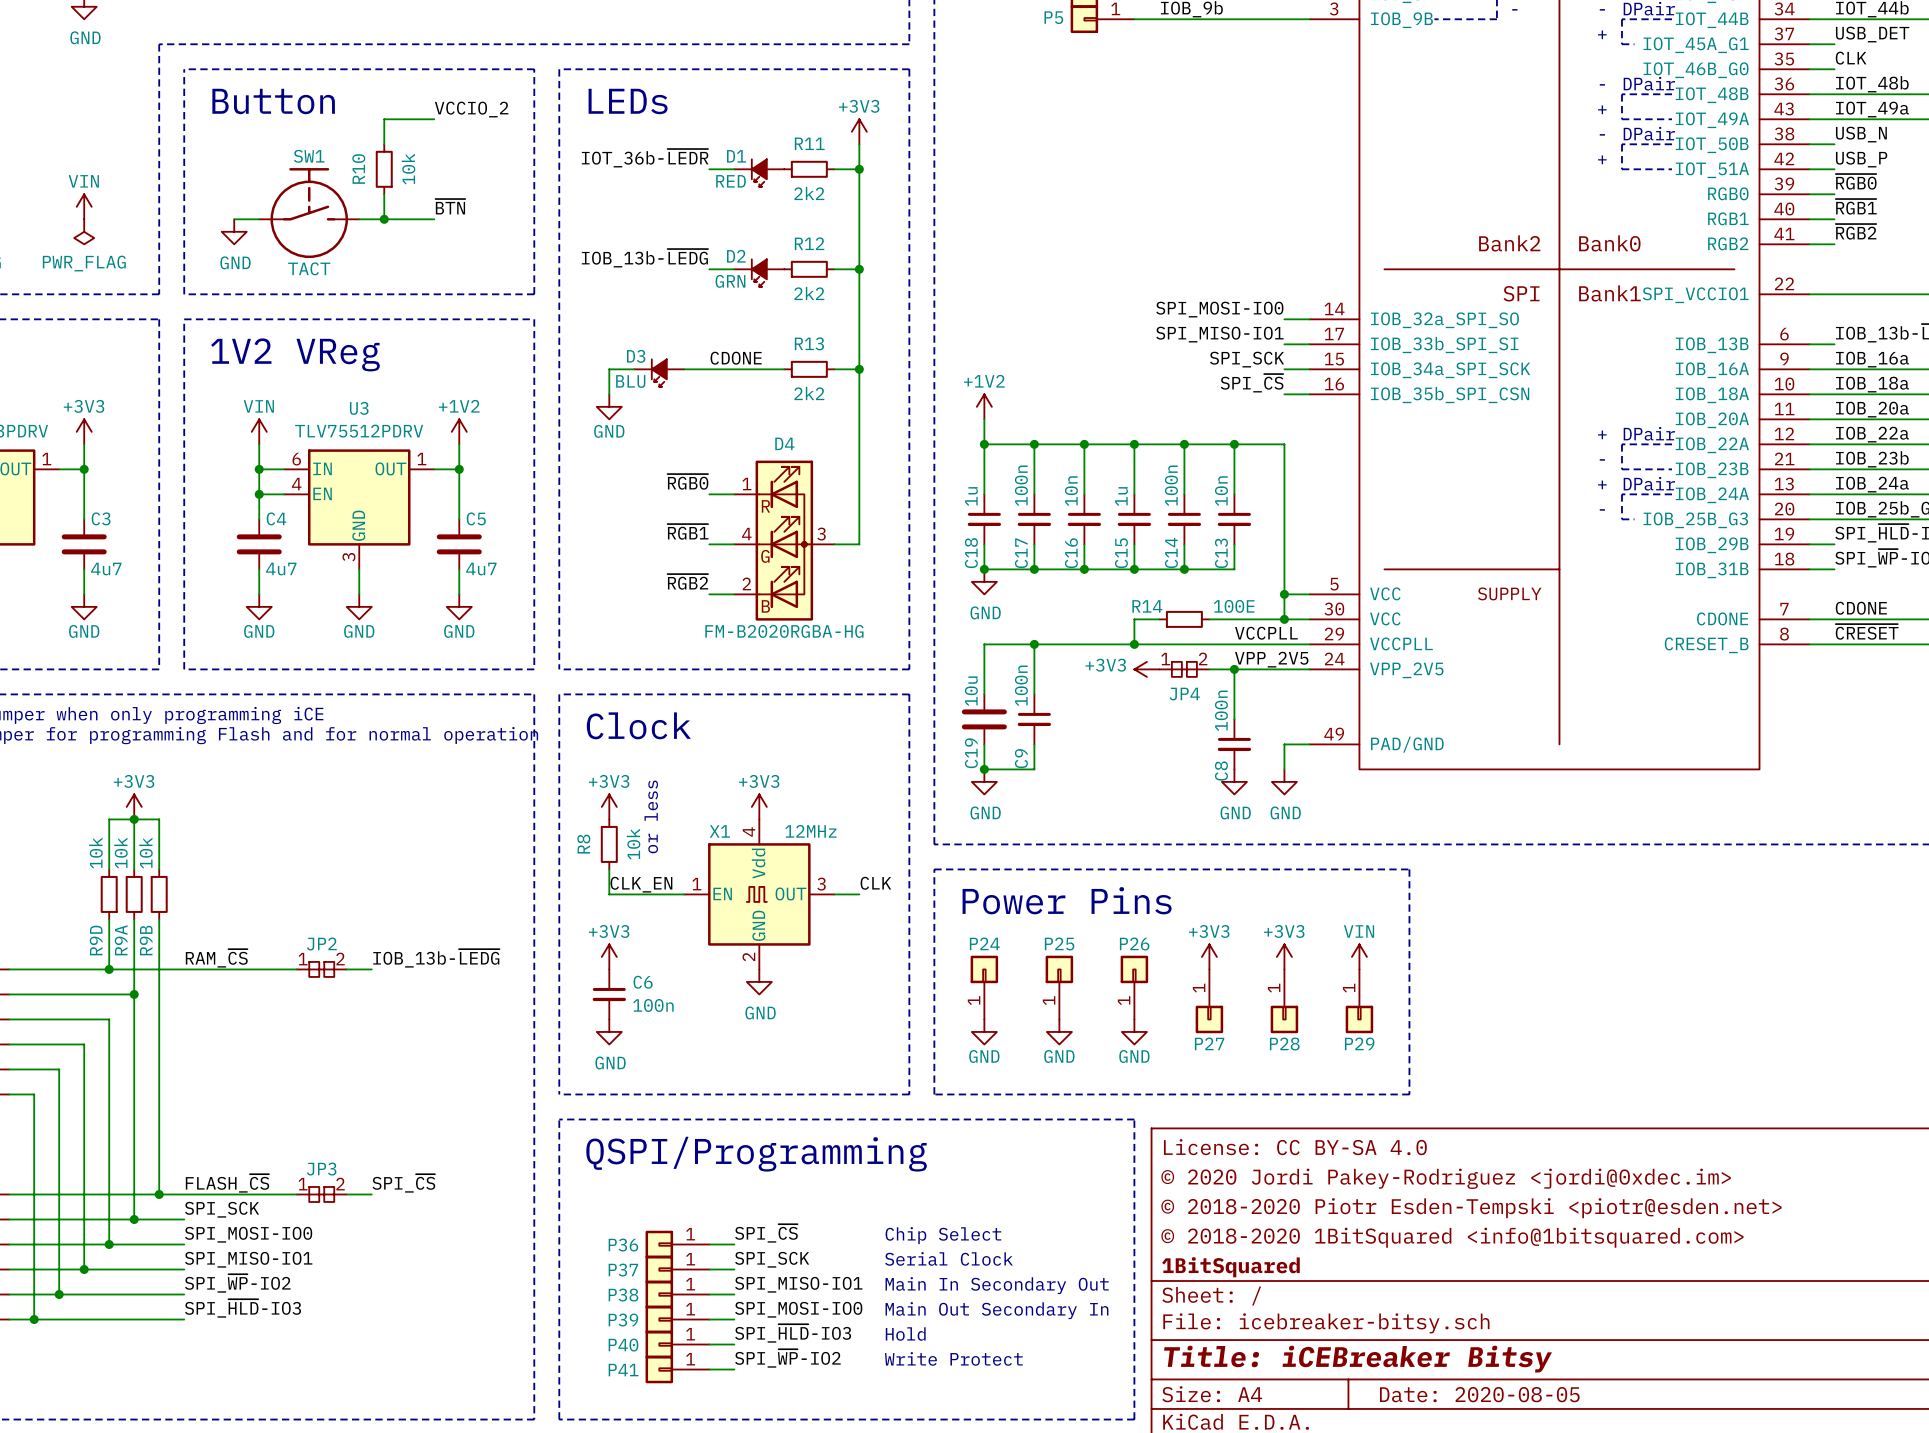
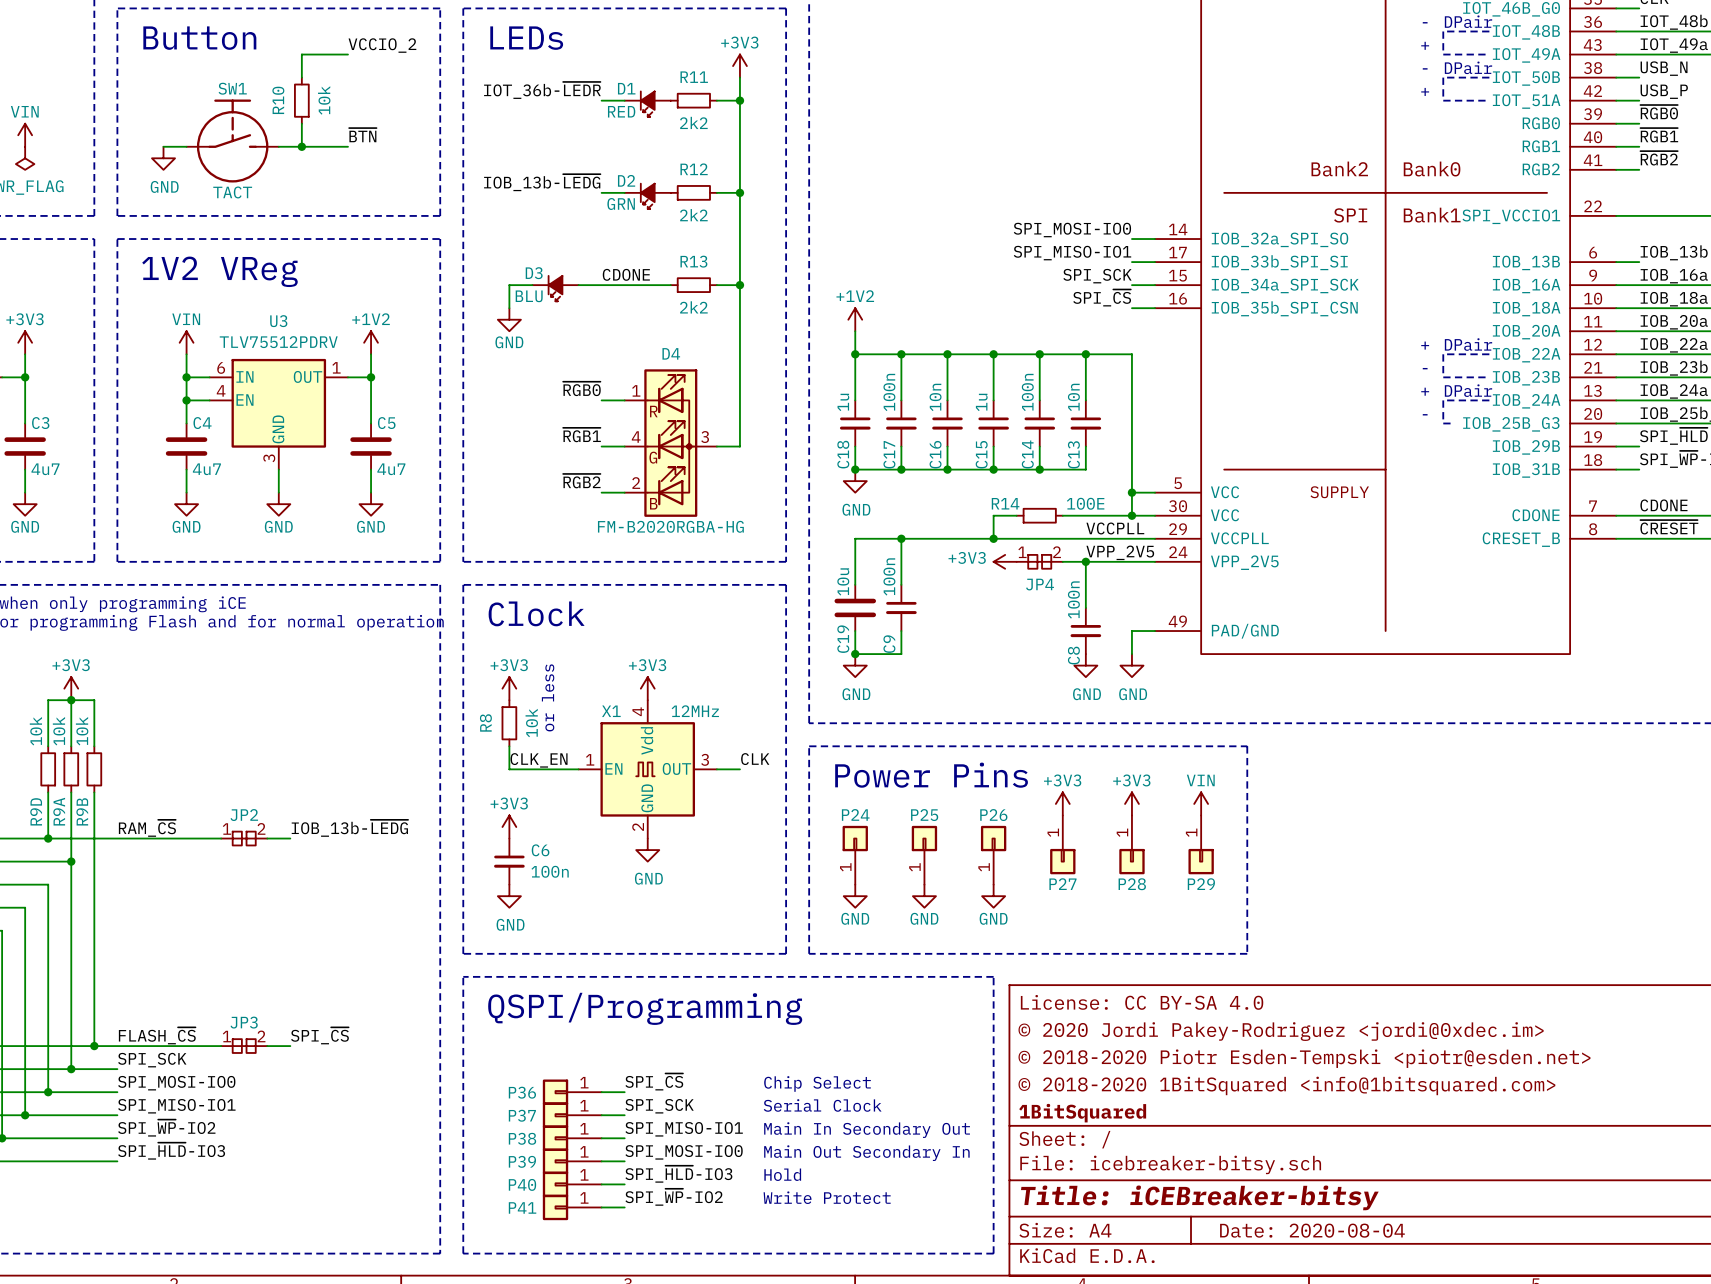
power symbol position: +3V3 (1209, 956) -> +3V3 (1062, 803)
power symbol position: +3V3 (1284, 956) -> +3V3 (1131, 803)
power symbol position: VIN (1359, 956) -> VIN (1201, 803)
P27 position: (1209, 1001) -> (1062, 844)
P28 position: (1284, 1001) -> (1131, 844)
P29 position: (1359, 1001) -> (1201, 844)
title block: Title: iCEBreaker Bitsy (1358, 1359) -> Title: iCEBreaker-bitsy (1199, 1197)
title block: Date: 2020-08-05 (1479, 1394) -> Date: 2020-08-04 (1312, 1230)

